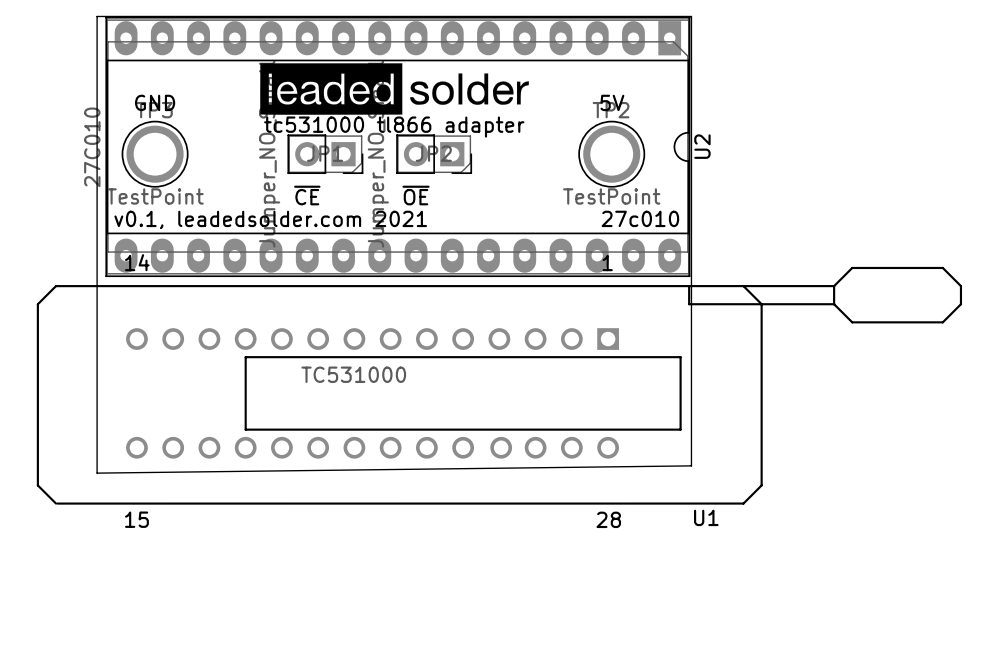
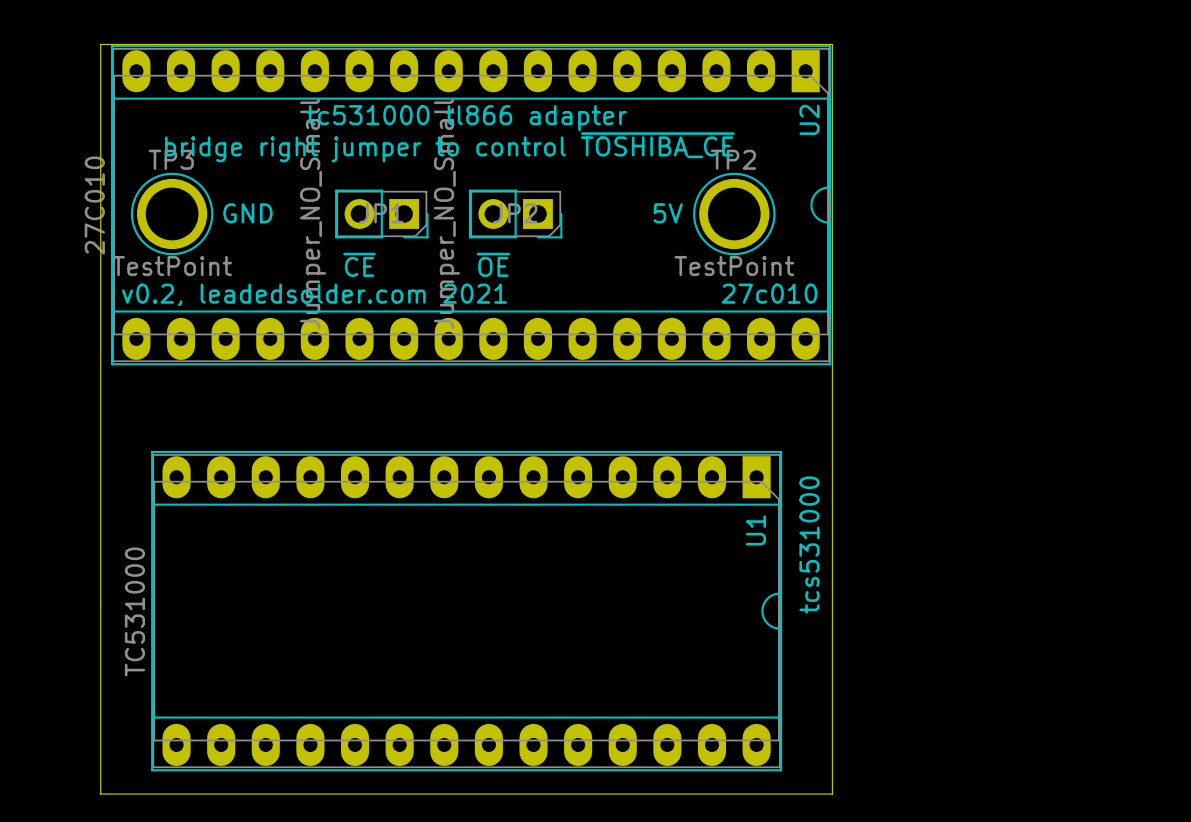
drawing: [260, 63, 529, 115] -> none
text: none -> bridge right jumper to control ~{TOSHIBA_CE} (449, 147)
text position: GND (155, 102) -> GND (247, 213)
text position: 5V (612, 102) -> 5V (668, 213)
text position: tc531000 tl866 adapter (394, 127) -> tc531000 tl866 adapter (466, 118)
U2 name position: U2 (702, 146) -> U2 (809, 119)
text: v0.1, leadedsolder.com 2021 (270, 219) -> v0.2, leadedsolder.com 2021 (314, 294)
U1 footprint: [36, 266, 963, 505] -> [151, 450, 783, 772]
U1 value position: TC531000 (353, 374) -> TC531000 (134, 611)
text: none -> tcs531000 (809, 545)
board edge: (691, 465) (97, 473) -> (832, 597) (832, 794) (100, 794) (100, 606)
U1 name position: U1 (706, 517) -> U1 (755, 530)

